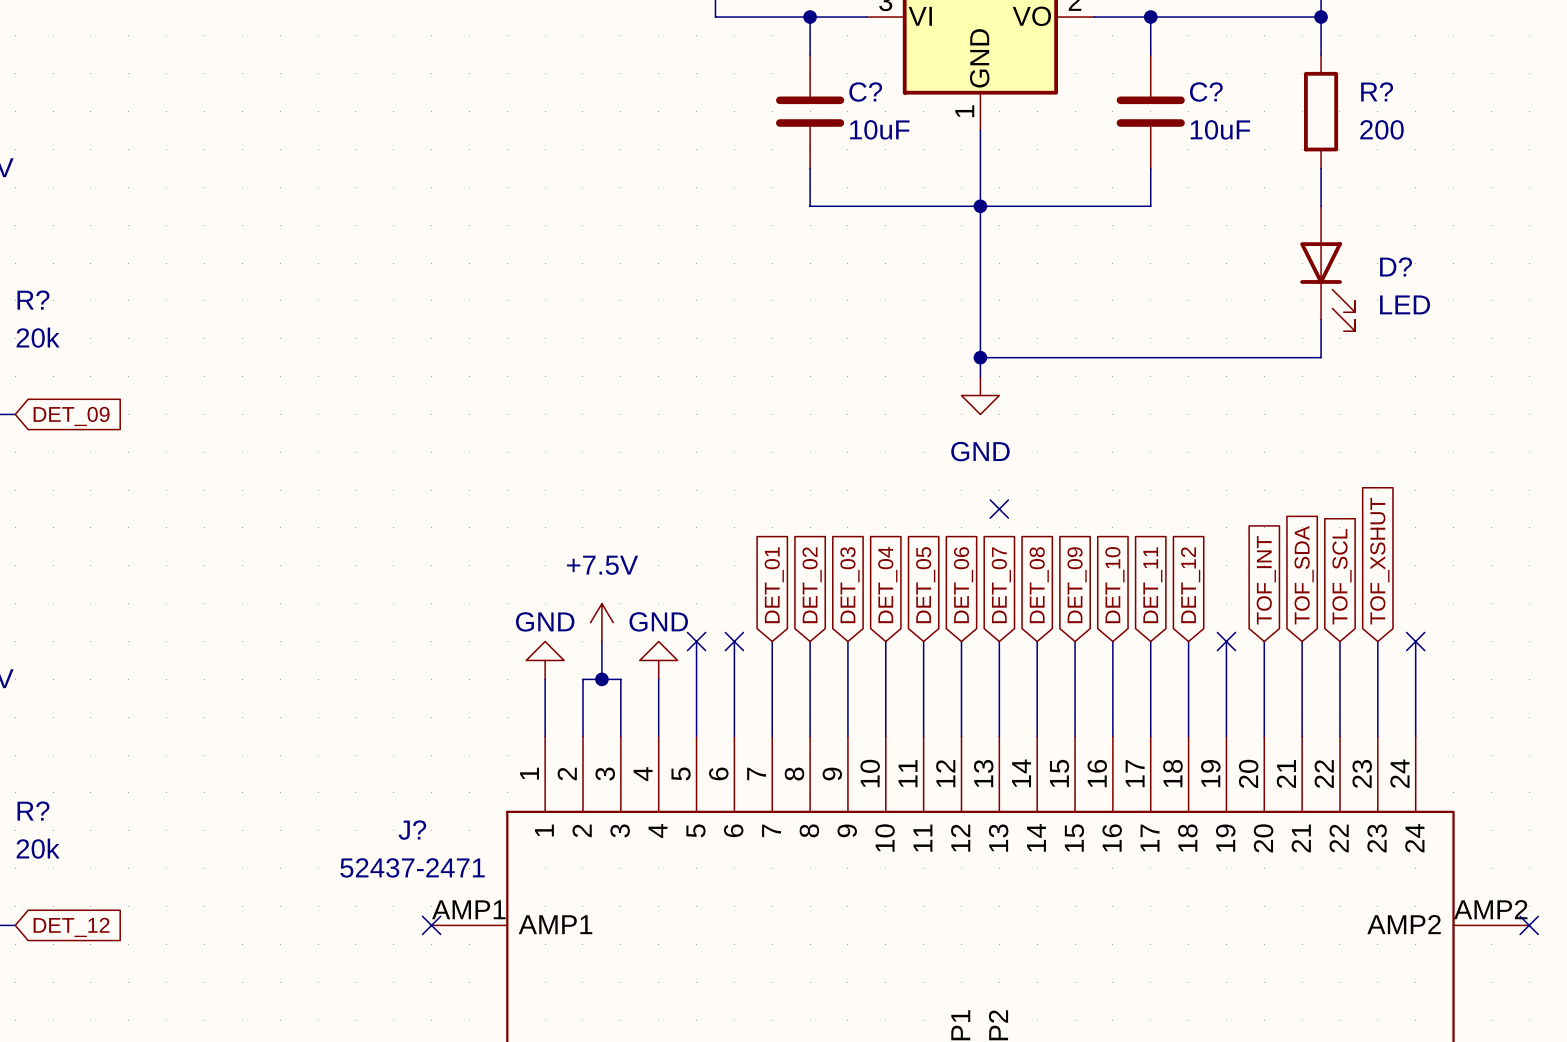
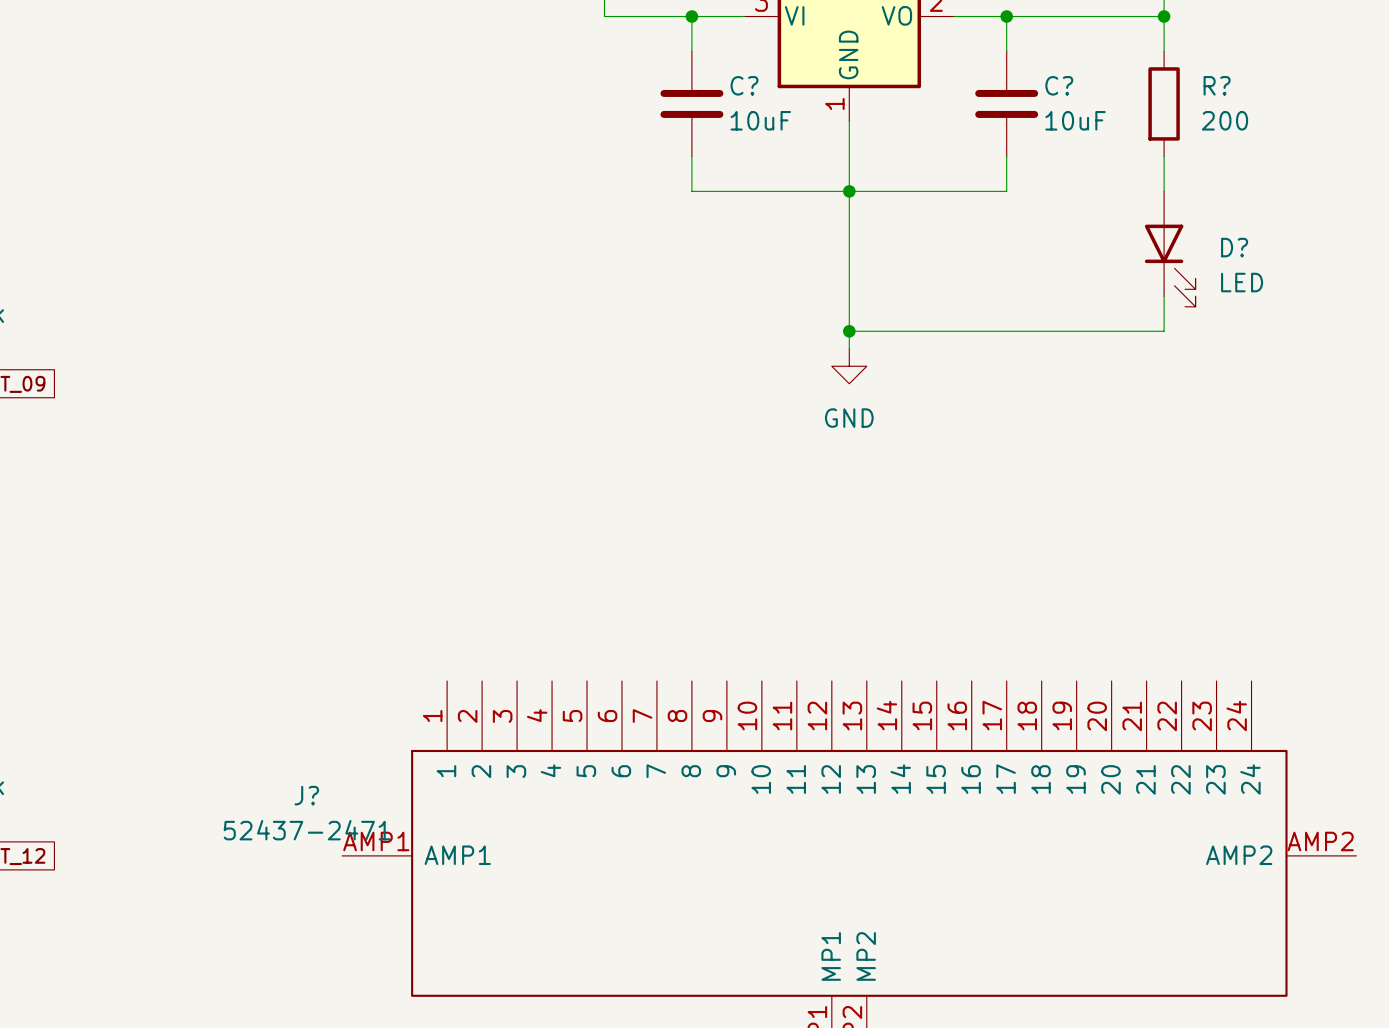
no-connect mark: (999, 509) -> none
global label: TOF_XSHUT (1379, 561) -> none
global label: TOF_SDA (1304, 575) -> none
global label: TOF_SCL (1342, 576) -> none
global label: TOF_INT (1266, 580) -> none
global label: DET_01 (774, 585) -> none
global label: DET_02 (812, 585) -> none
global label: DET_03 (849, 585) -> none
global label: DET_04 (887, 585) -> none
global label: DET_05 (925, 585) -> none
global label: DET_06 (963, 585) -> none
global label: DET_07 (1001, 585) -> none
global label: DET_08 (1039, 585) -> none
global label: DET_09 (1077, 585) -> none
global label: DET_10 (1114, 585) -> none
global label: DET_11 (1152, 585) -> none
global label: DET_12 (1190, 585) -> none
power symbol: +7.5V (601, 622) -> none
wire: (601, 641) (601, 679) -> none
wire: (696, 641) (696, 736) -> none
no-connect mark: (696, 641) -> none
wire: (734, 641) (734, 736) -> none
no-connect mark: (734, 641) -> none
wire: (772, 641) (772, 736) -> none
wire: (810, 641) (810, 736) -> none
wire: (847, 641) (847, 736) -> none
wire: (885, 641) (885, 736) -> none
wire: (923, 641) (923, 736) -> none
wire: (961, 641) (961, 736) -> none
wire: (999, 641) (999, 736) -> none
wire: (1037, 641) (1037, 736) -> none
wire: (1075, 641) (1075, 736) -> none
wire: (1112, 641) (1112, 736) -> none
wire: (1150, 641) (1150, 736) -> none
wire: (1188, 641) (1188, 736) -> none
wire: (1226, 641) (1226, 736) -> none
no-connect mark: (1226, 641) -> none
wire: (1264, 641) (1264, 736) -> none
wire: (1302, 641) (1302, 736) -> none
wire: (1339, 641) (1339, 736) -> none
wire: (1377, 641) (1377, 736) -> none
wire: (1415, 641) (1415, 736) -> none
no-connect mark: (1415, 641) -> none
power symbol: GND (545, 660) -> none
power symbol: GND (658, 660) -> none
wire: (545, 679) (545, 736) -> none
junction: (601, 679) -> none
wire: (658, 679) (658, 736) -> none
wire: (582, 736) (582, 679) (620, 679) (620, 736) -> none
J? name position: J? (412, 830) -> J? (306, 795)
J? value position: 52437-2471 (412, 867) -> 52437-2471 (307, 830)
no-connect mark: (431, 925) -> none
no-connect mark: (1529, 925) -> none

